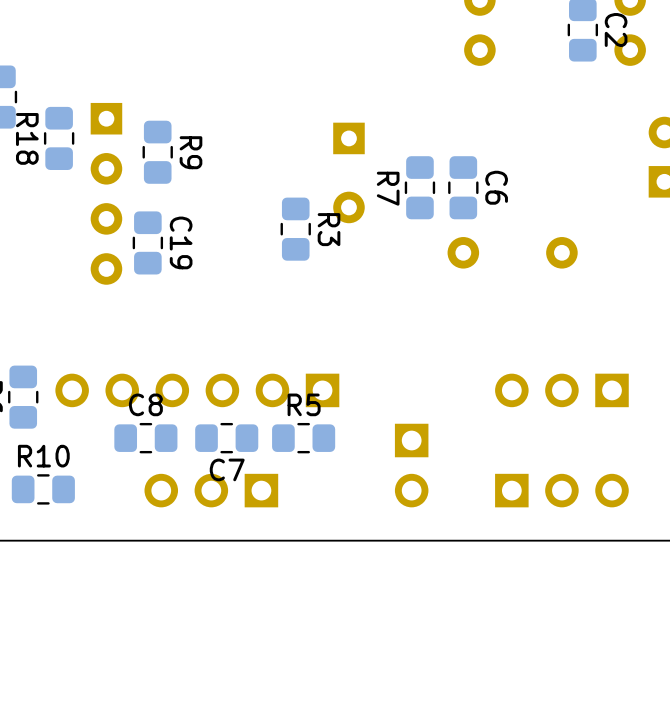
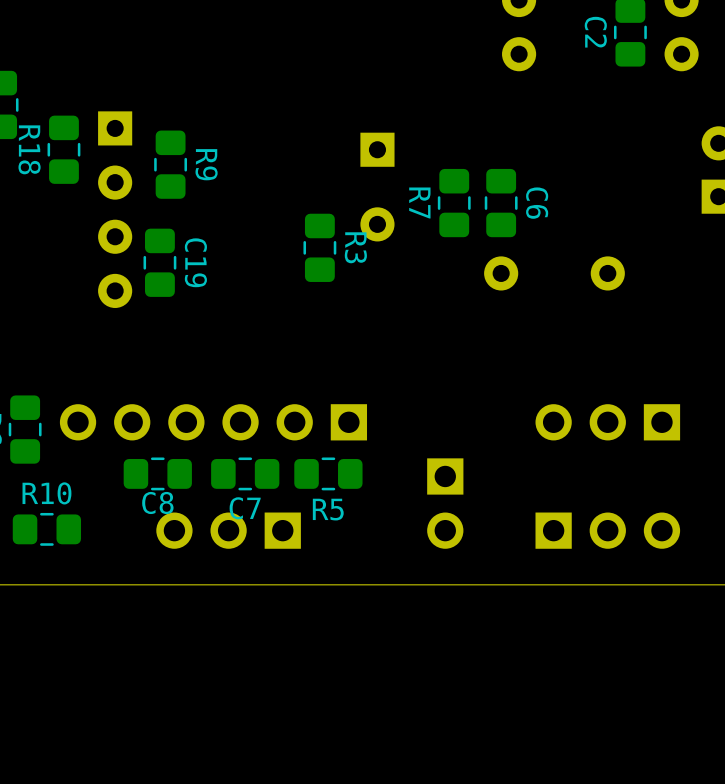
C2 name position: C2 (616, 29) -> C2 (595, 32)
C8 name position: C8 (145, 404) -> C8 (157, 502)
R5 name position: R5 (304, 404) -> R5 (328, 509)

